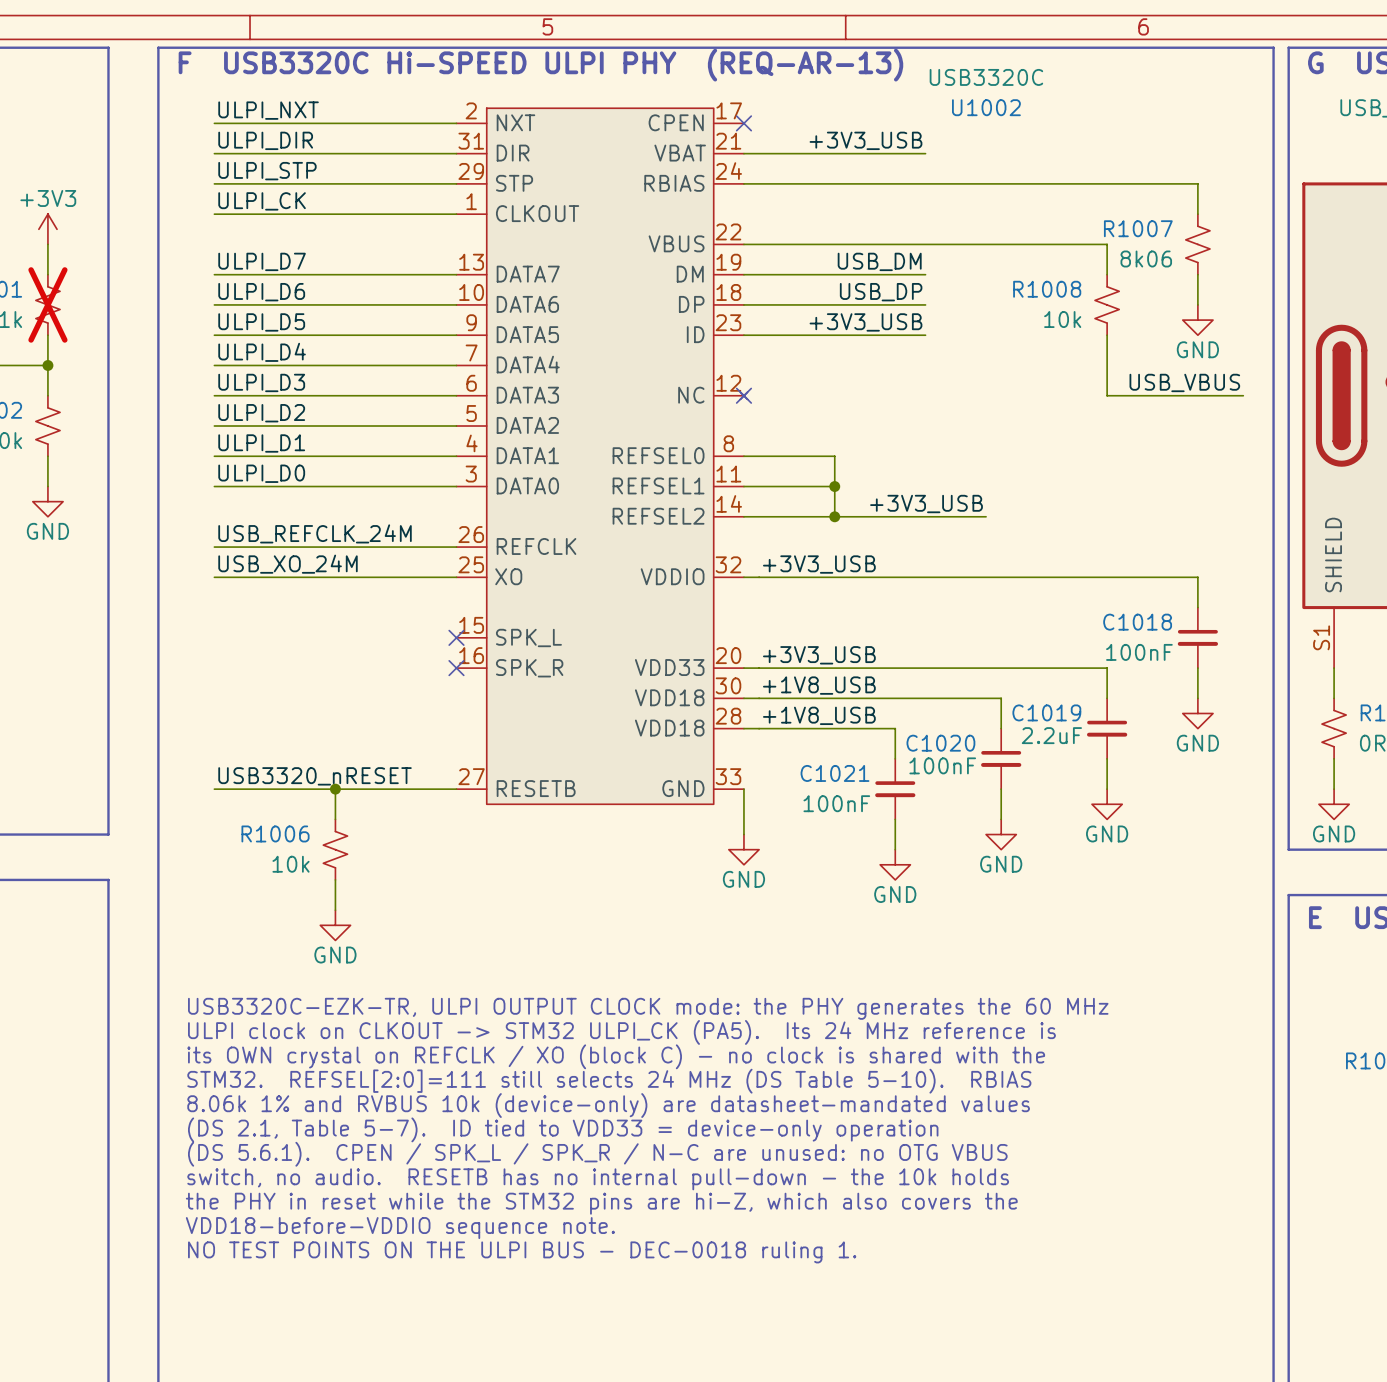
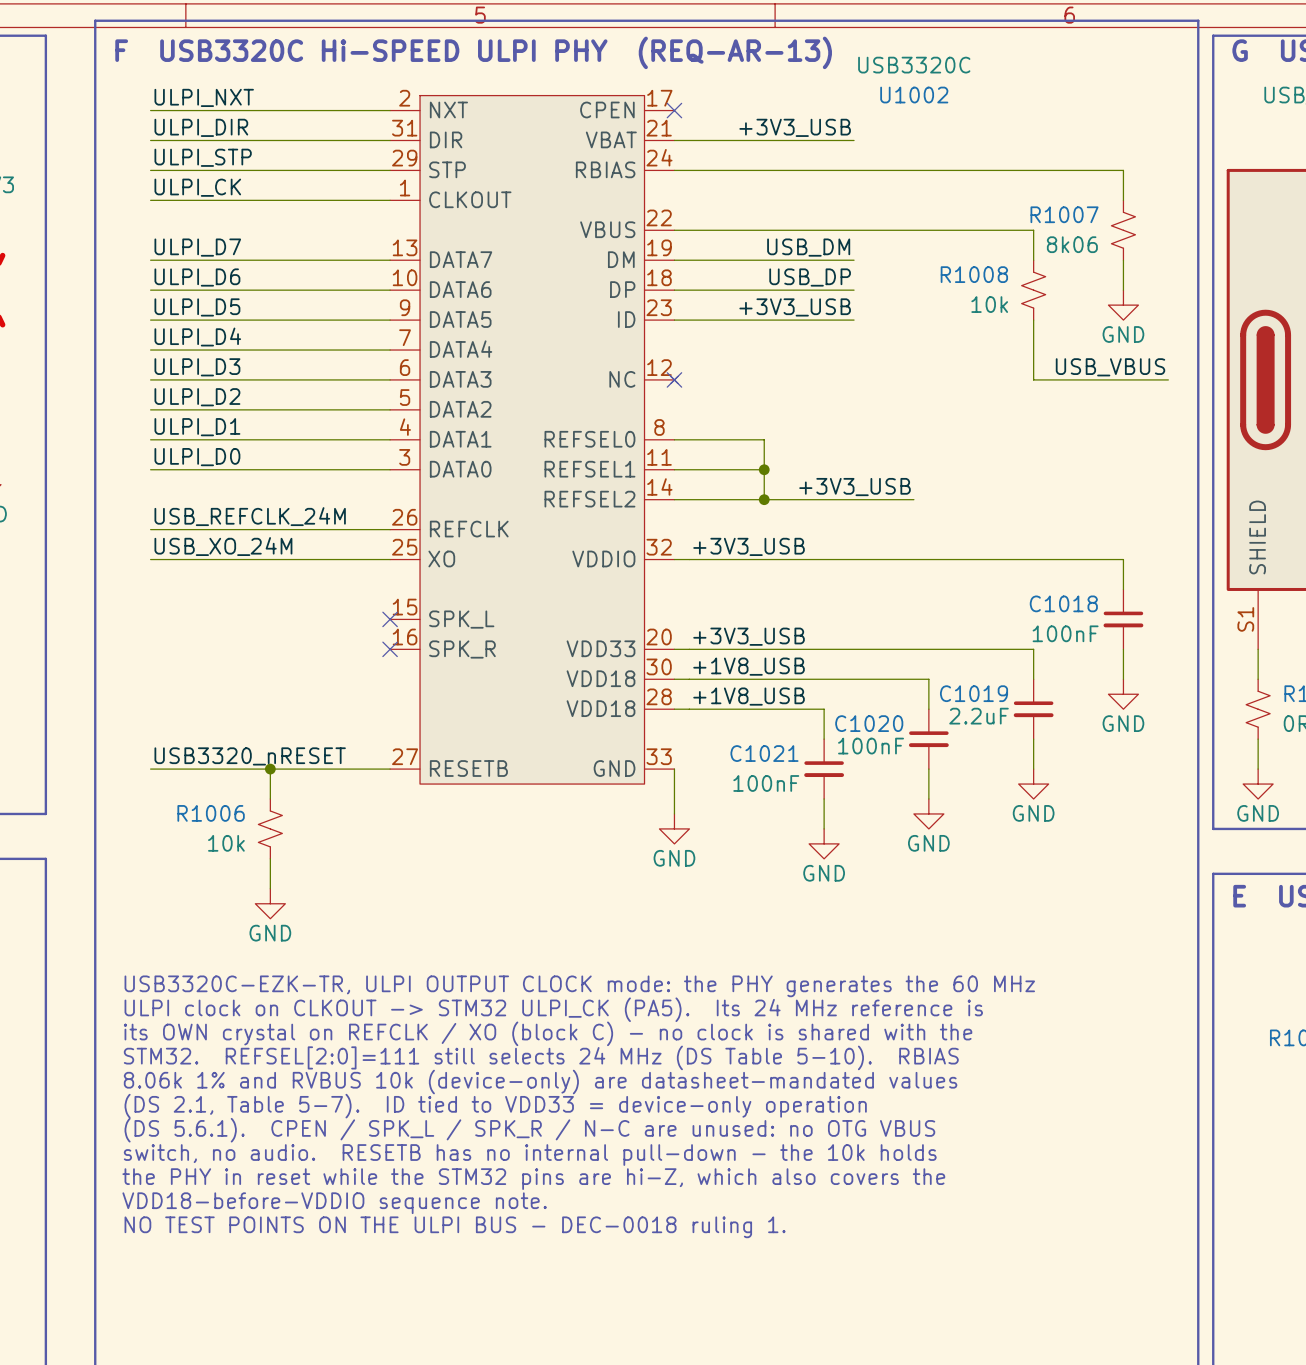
line: (158, 47) (1273, 47) -> (95, 35) (95, 20) (1198, 20) (1198, 35)

